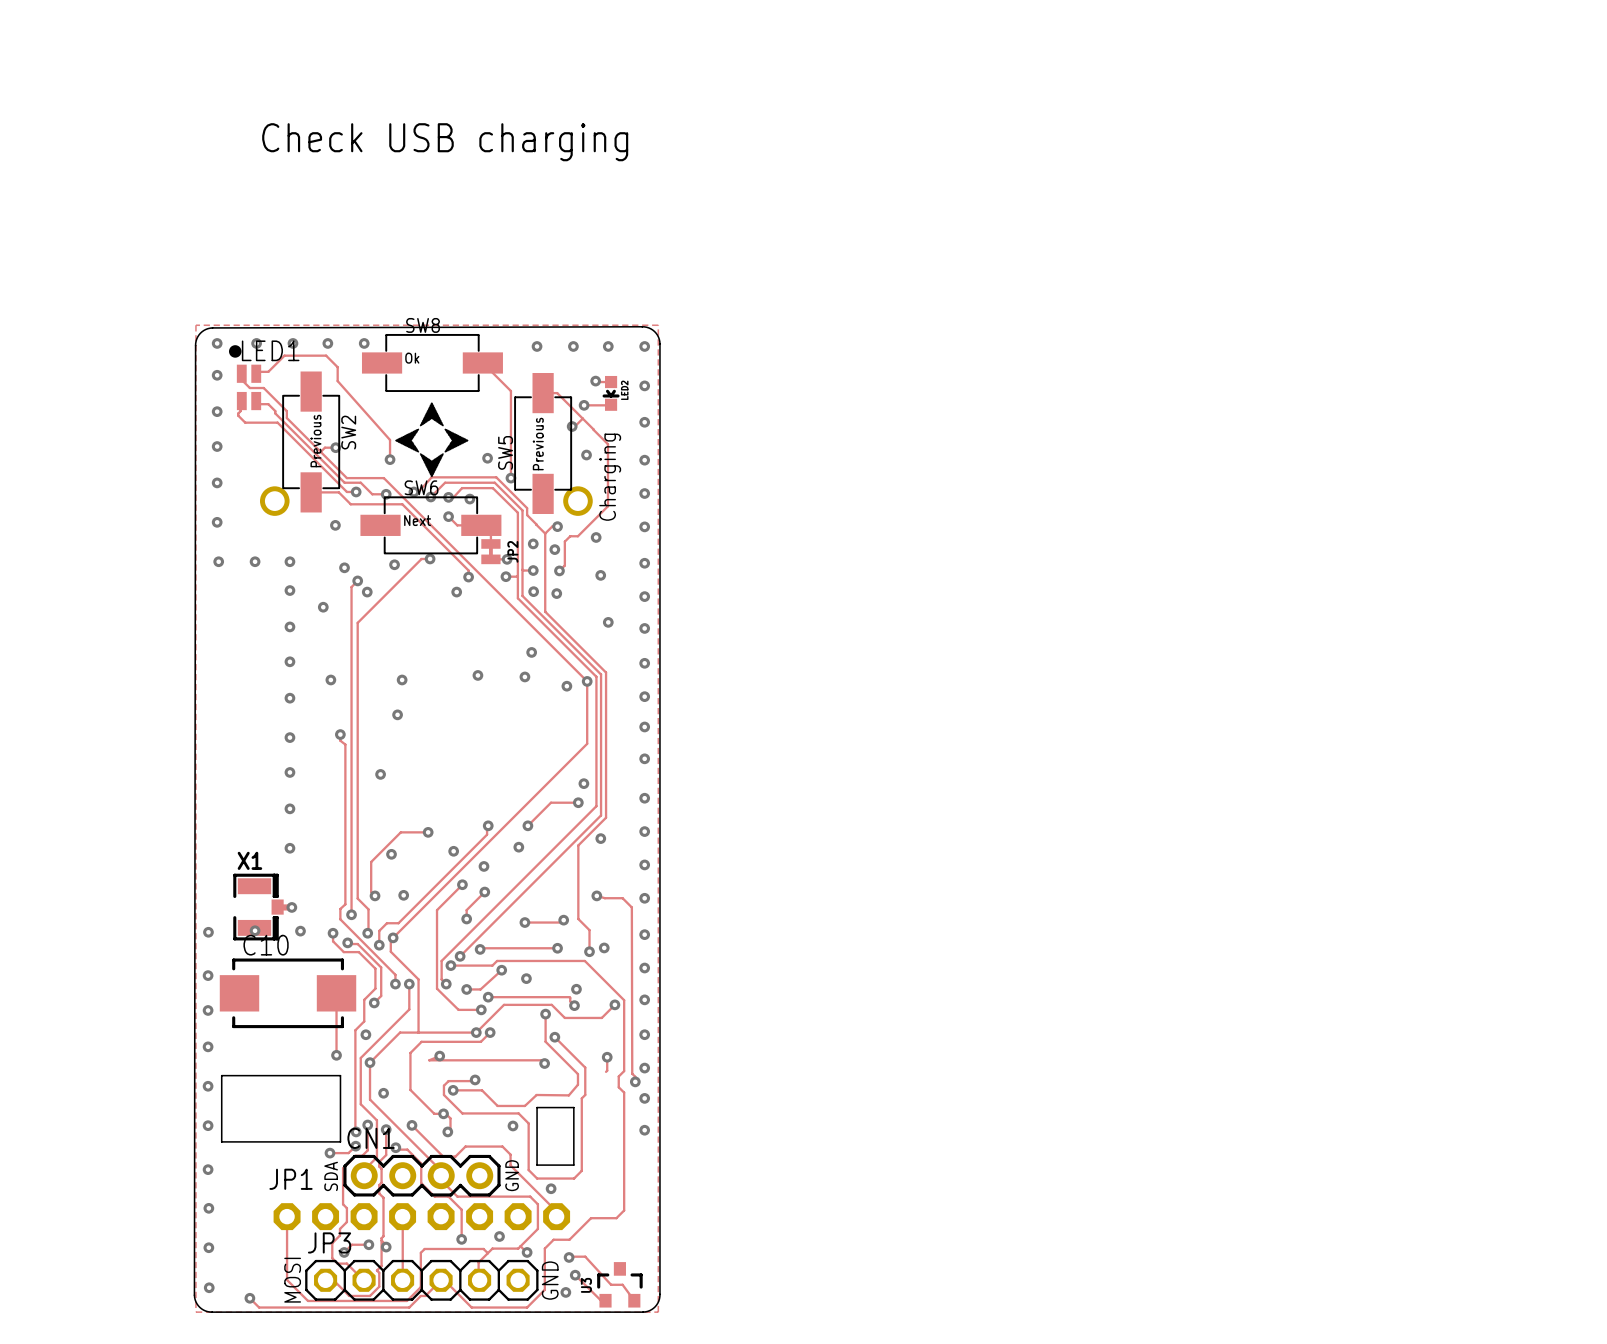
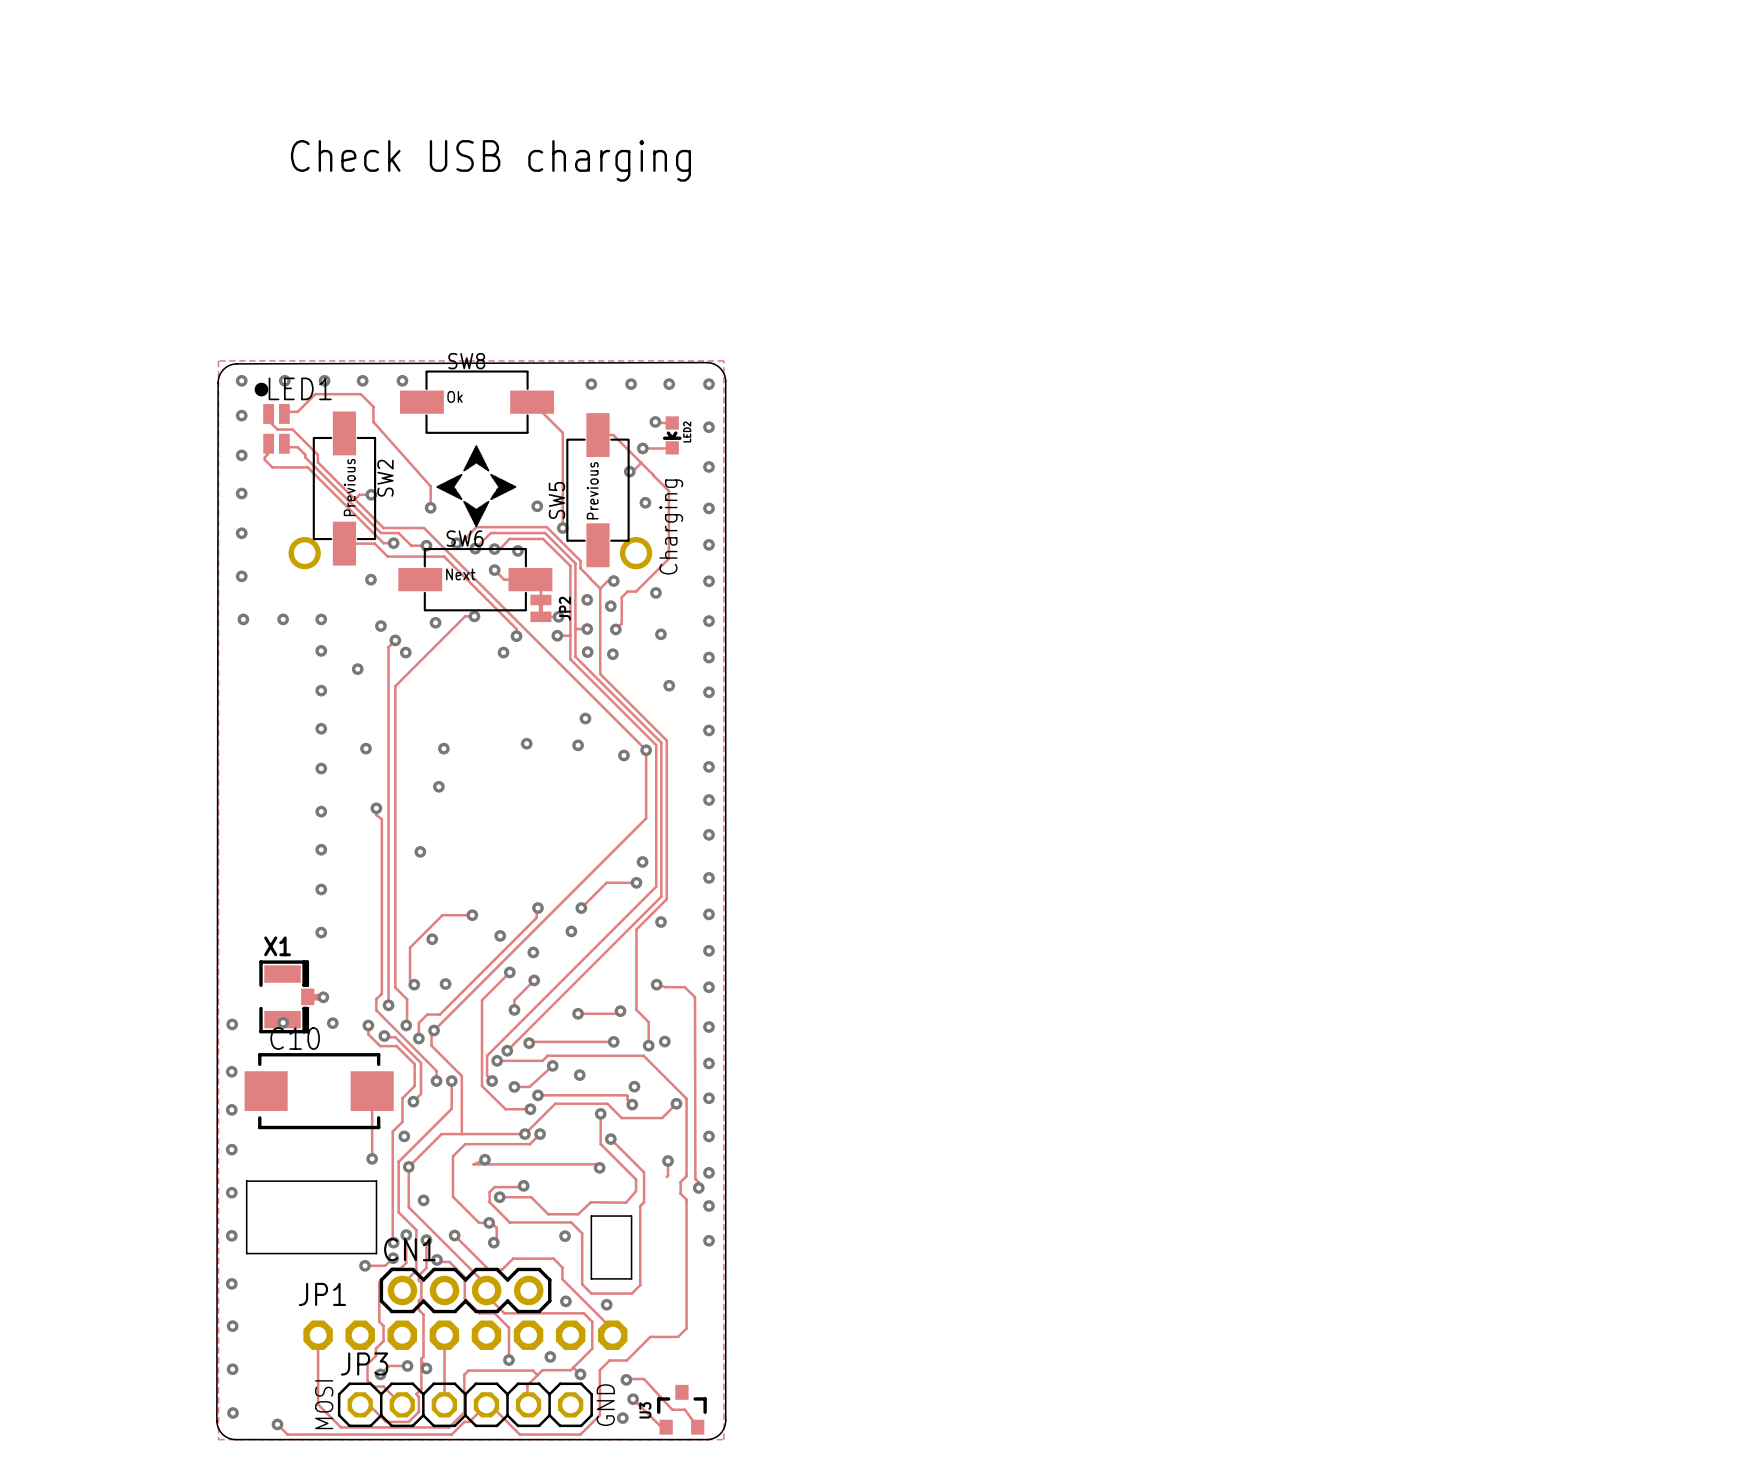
text: GND (512, 1175) -> none
text: SDA (331, 1176) -> none
via: none -> (565, 1301)

